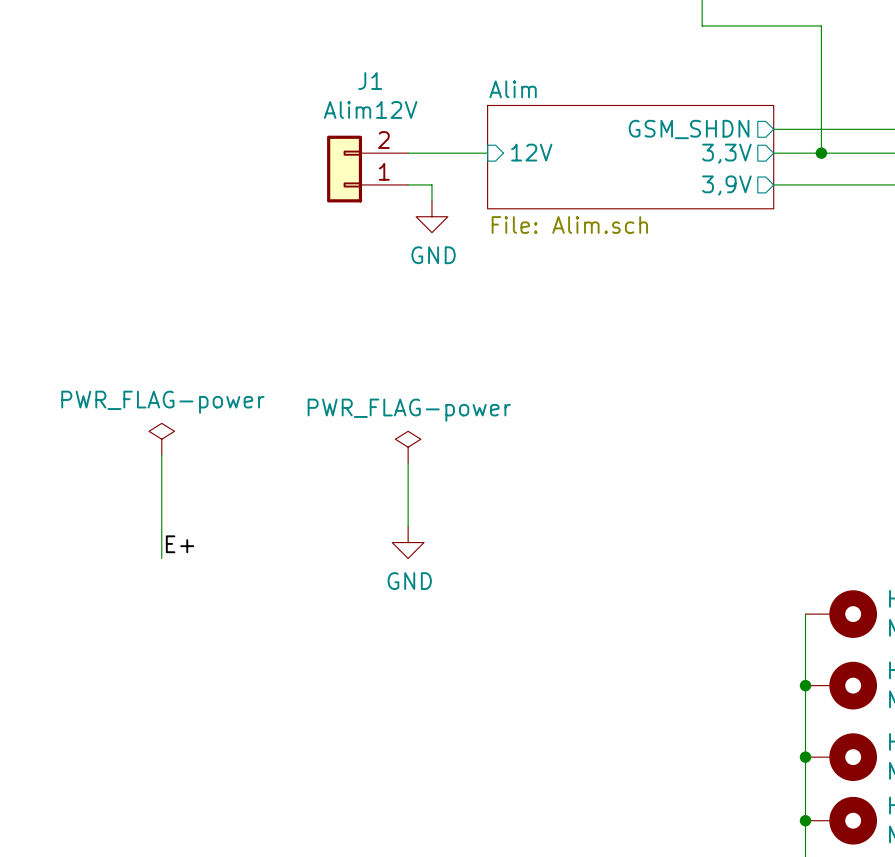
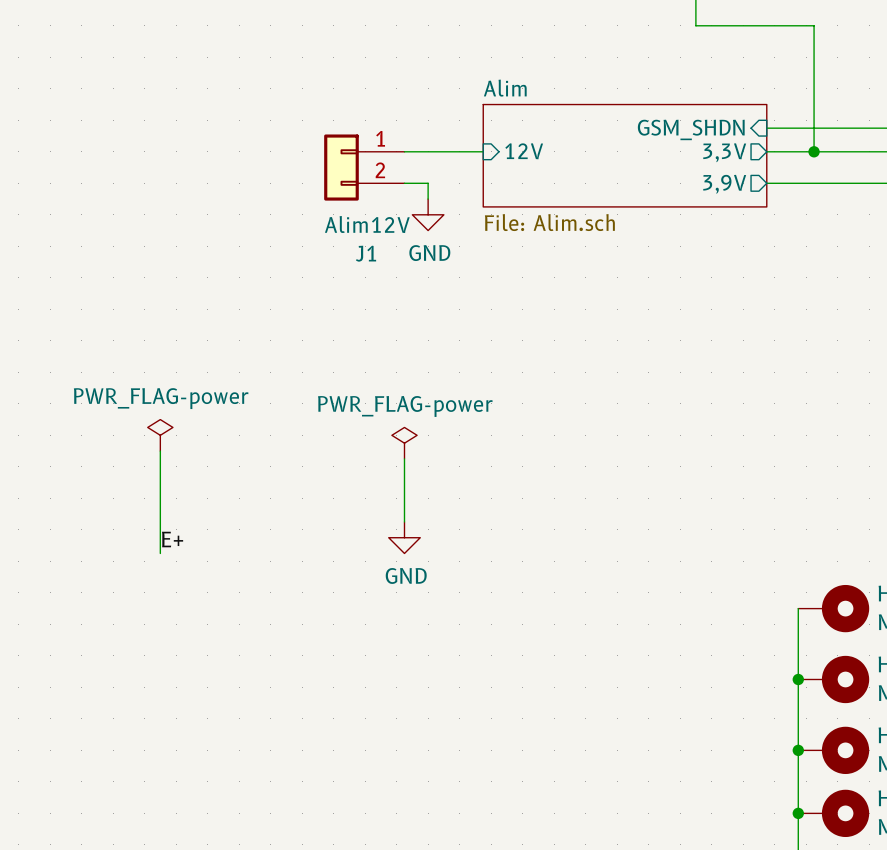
sheet pin shape: output (689, 129) -> input (691, 129)
J1 flip: as is (344, 169) -> up-down (341, 167)

